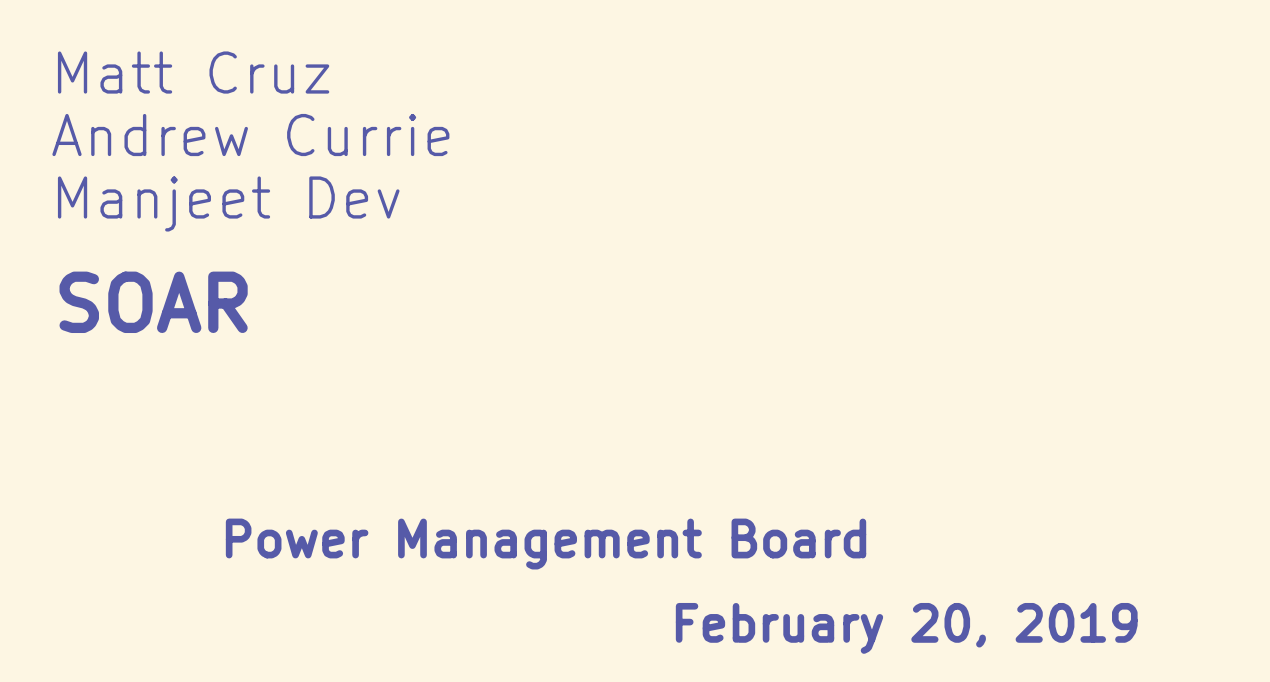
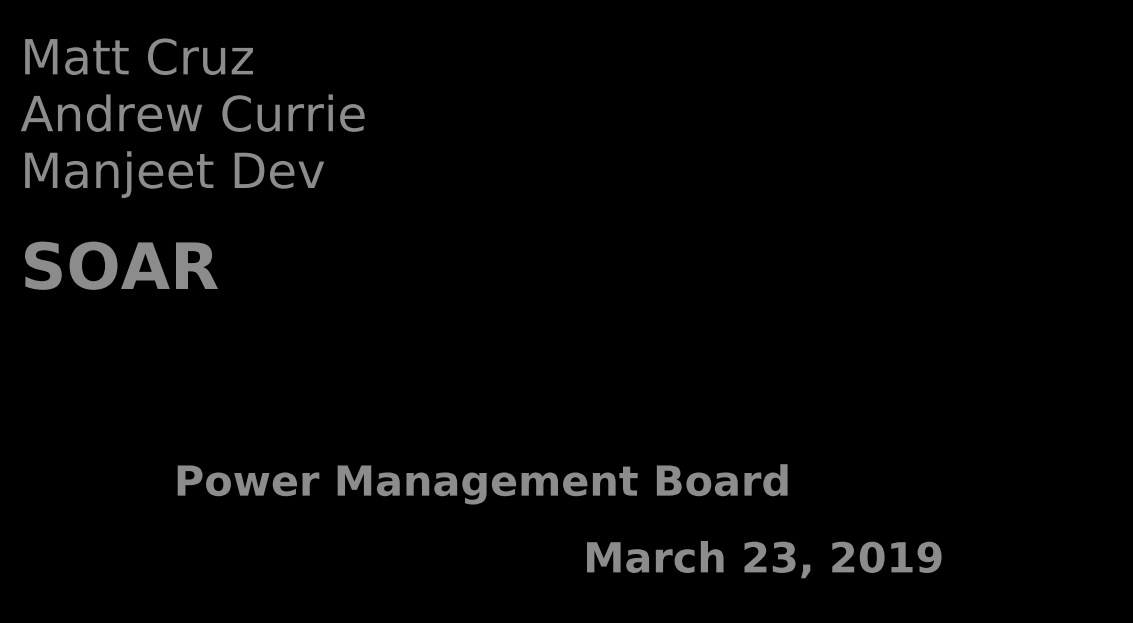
text: February 20, 2019 (906, 628) -> March 23, 2019 (764, 559)

